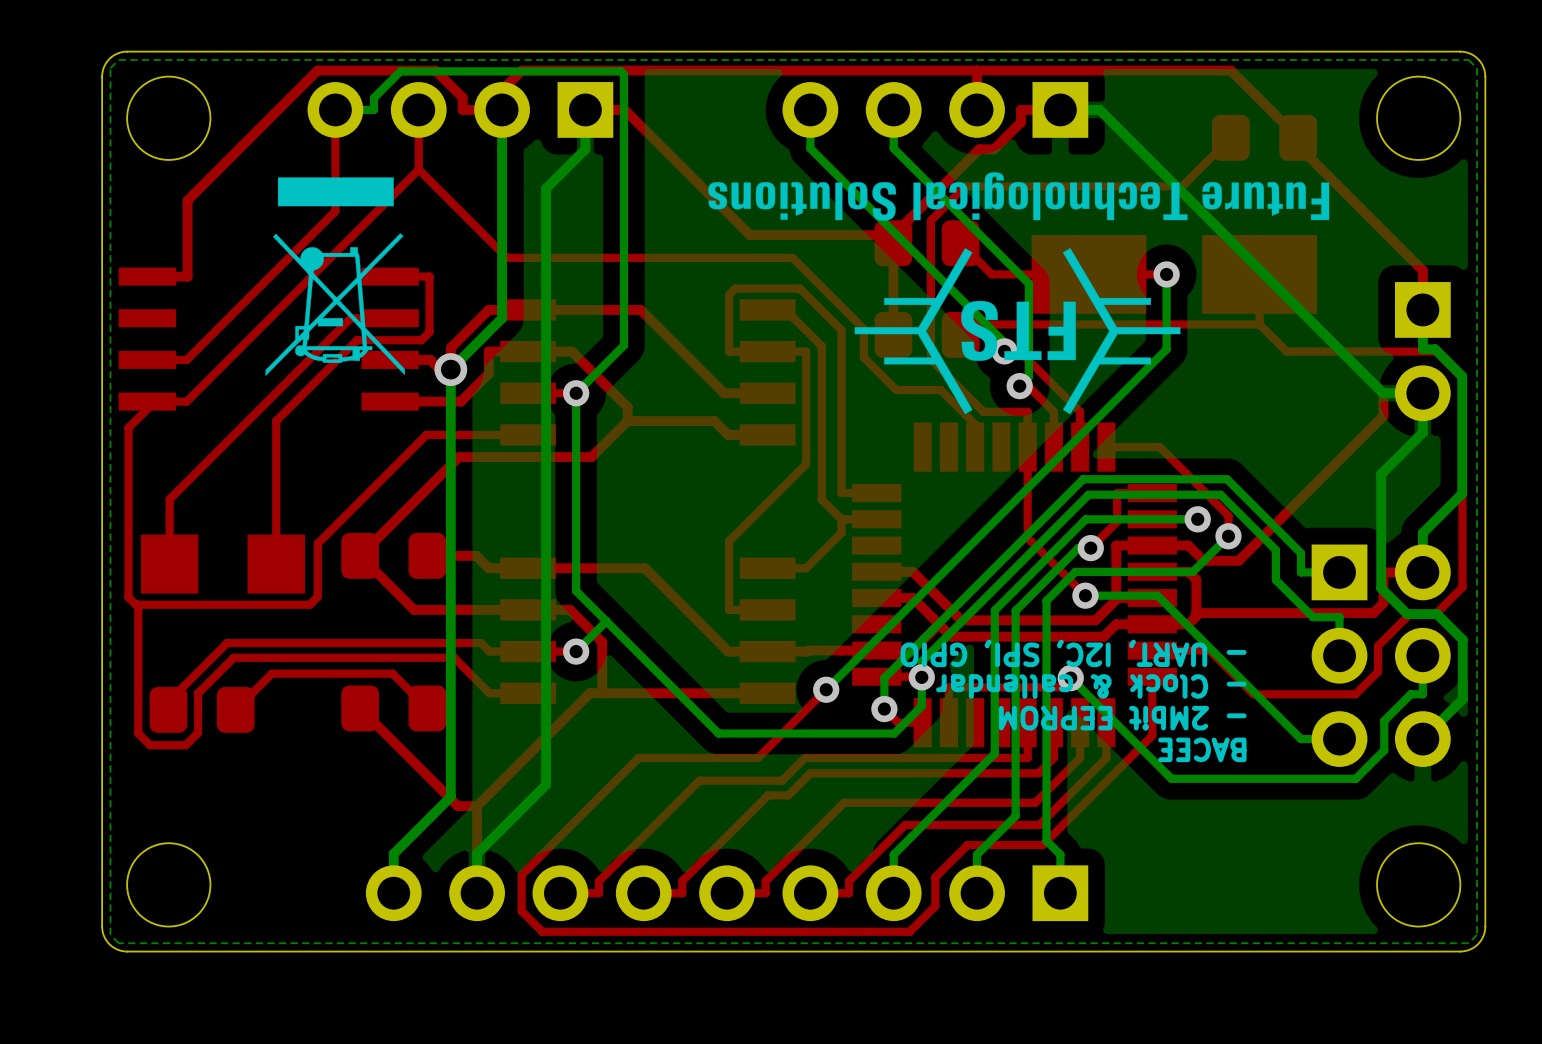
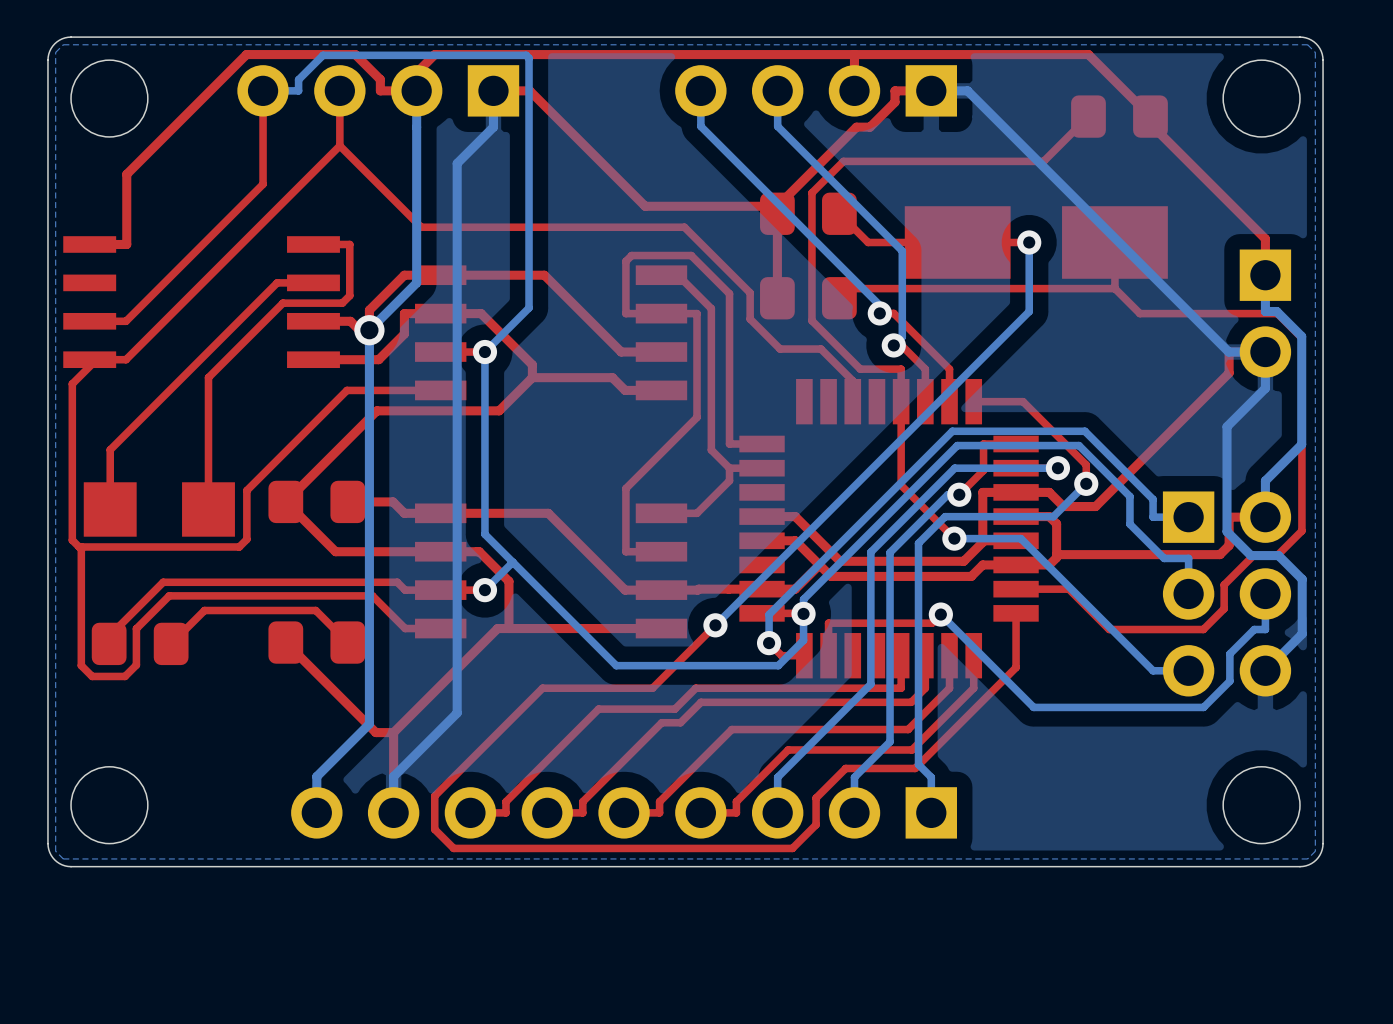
drawing: [708, 172, 1330, 415] -> none
drawing: [265, 177, 405, 376] -> none
text: - UART, I2C, SPI, GPIO (1073, 653) -> none
text: - Clock & callendar (1091, 686) -> none
text: - 2Mbit EEPROM (1122, 718) -> none
text: BACEE (1202, 749) -> none

